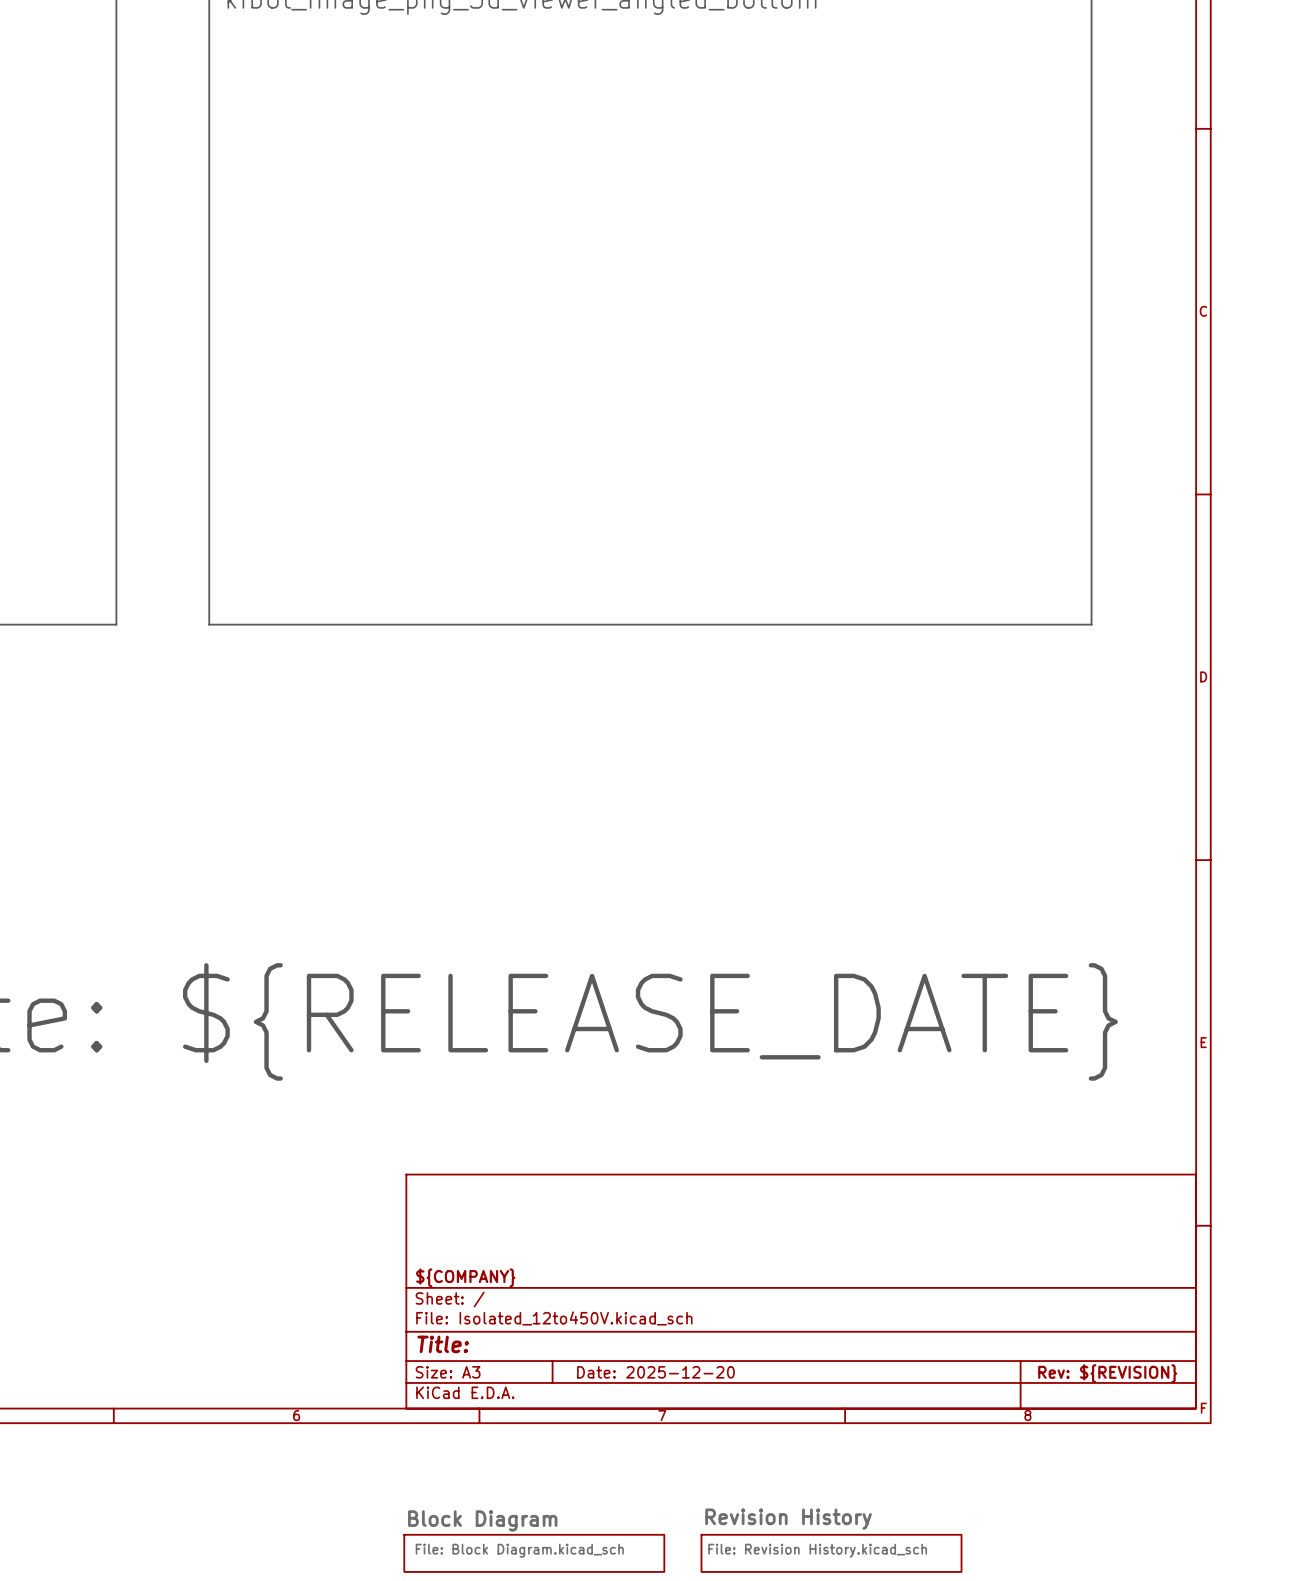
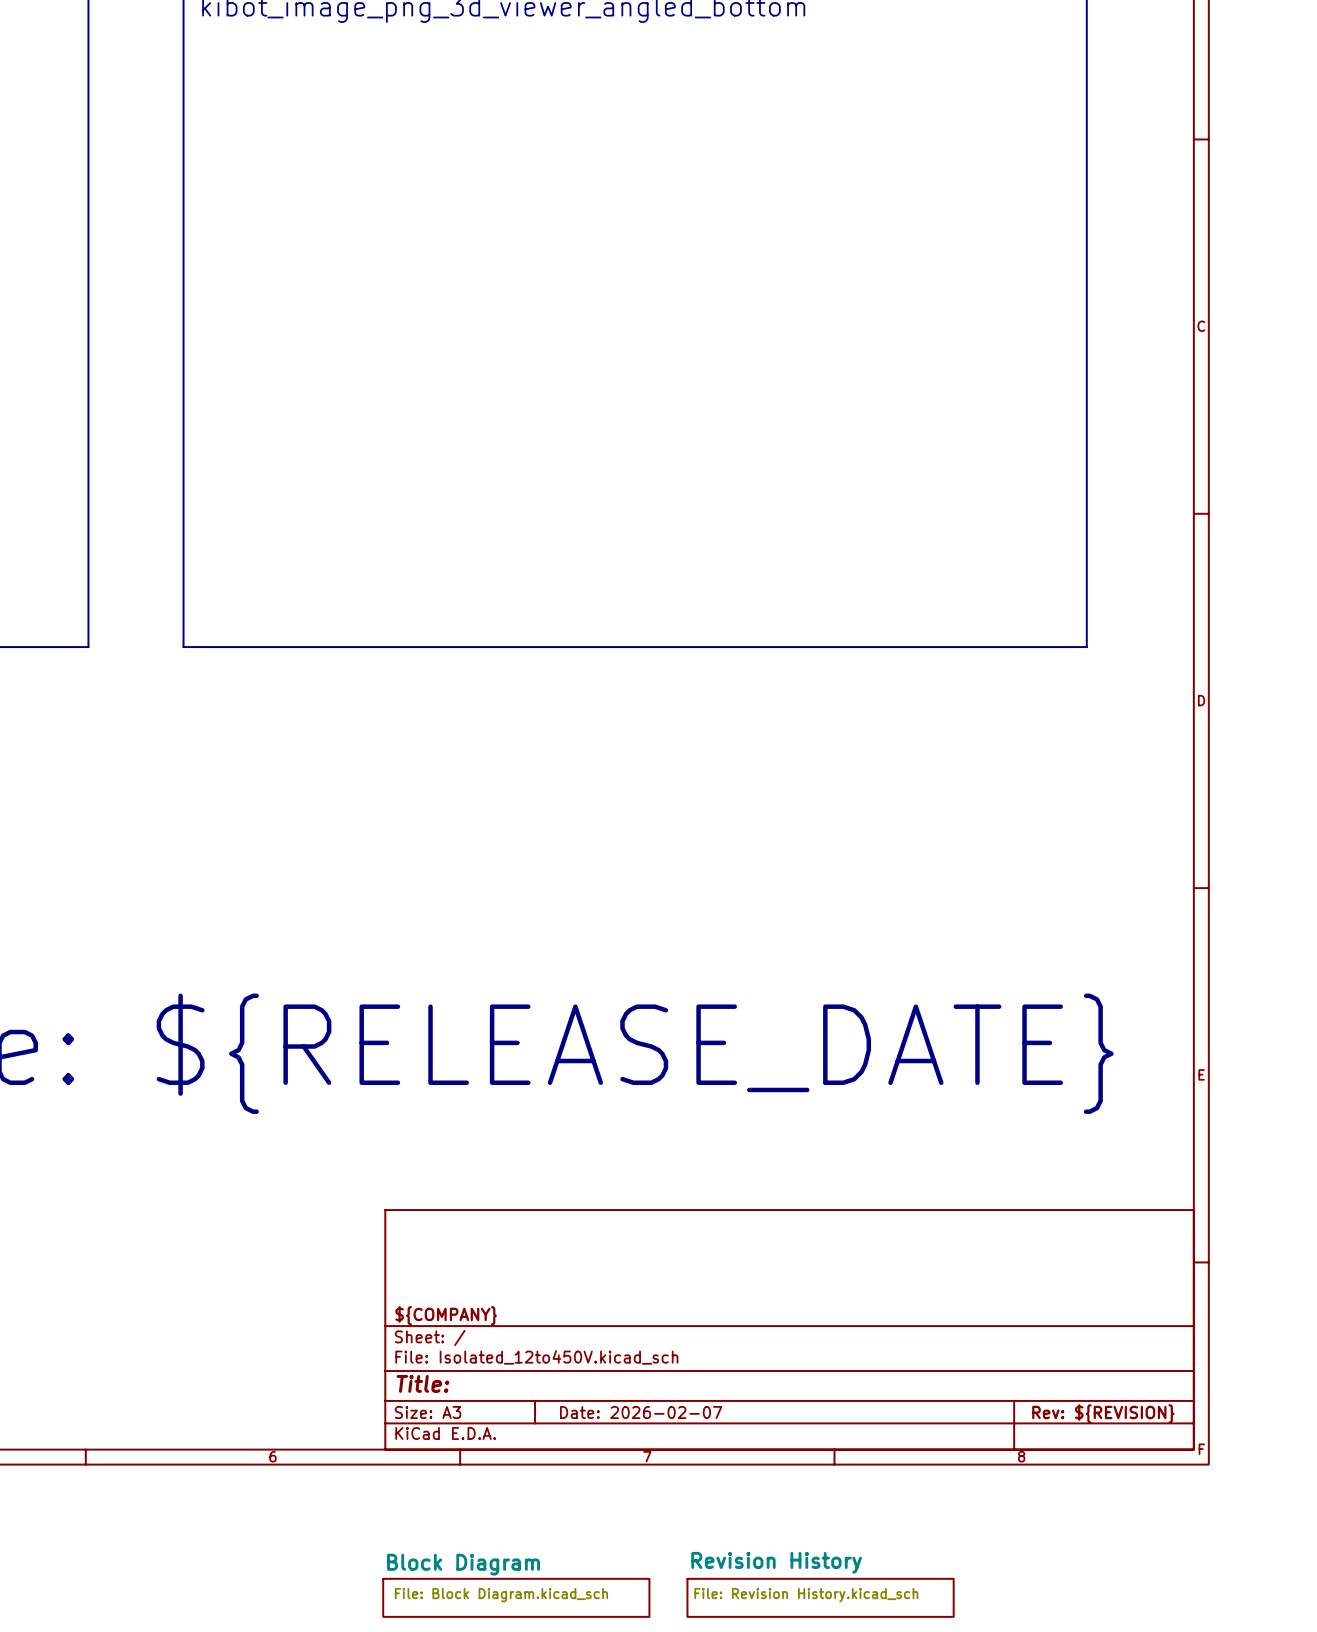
title block: Date: 2025-12-20 (655, 1372) -> Date: 2026-02-07 (641, 1412)

